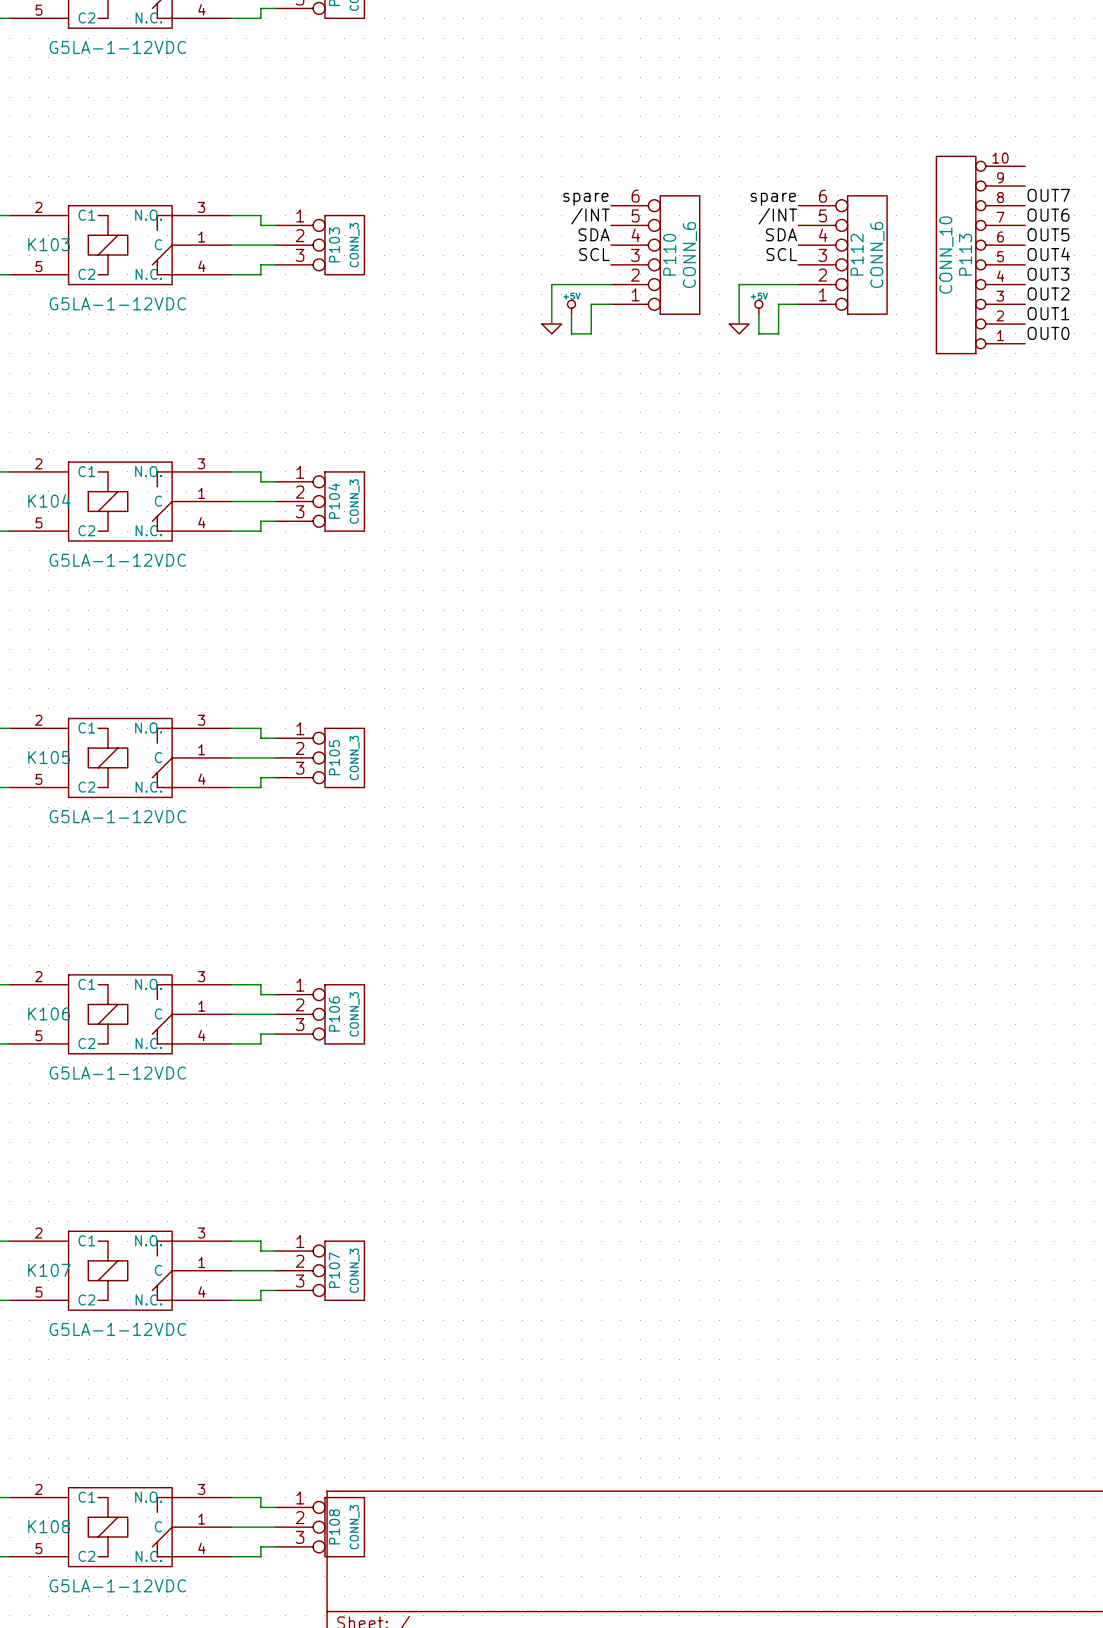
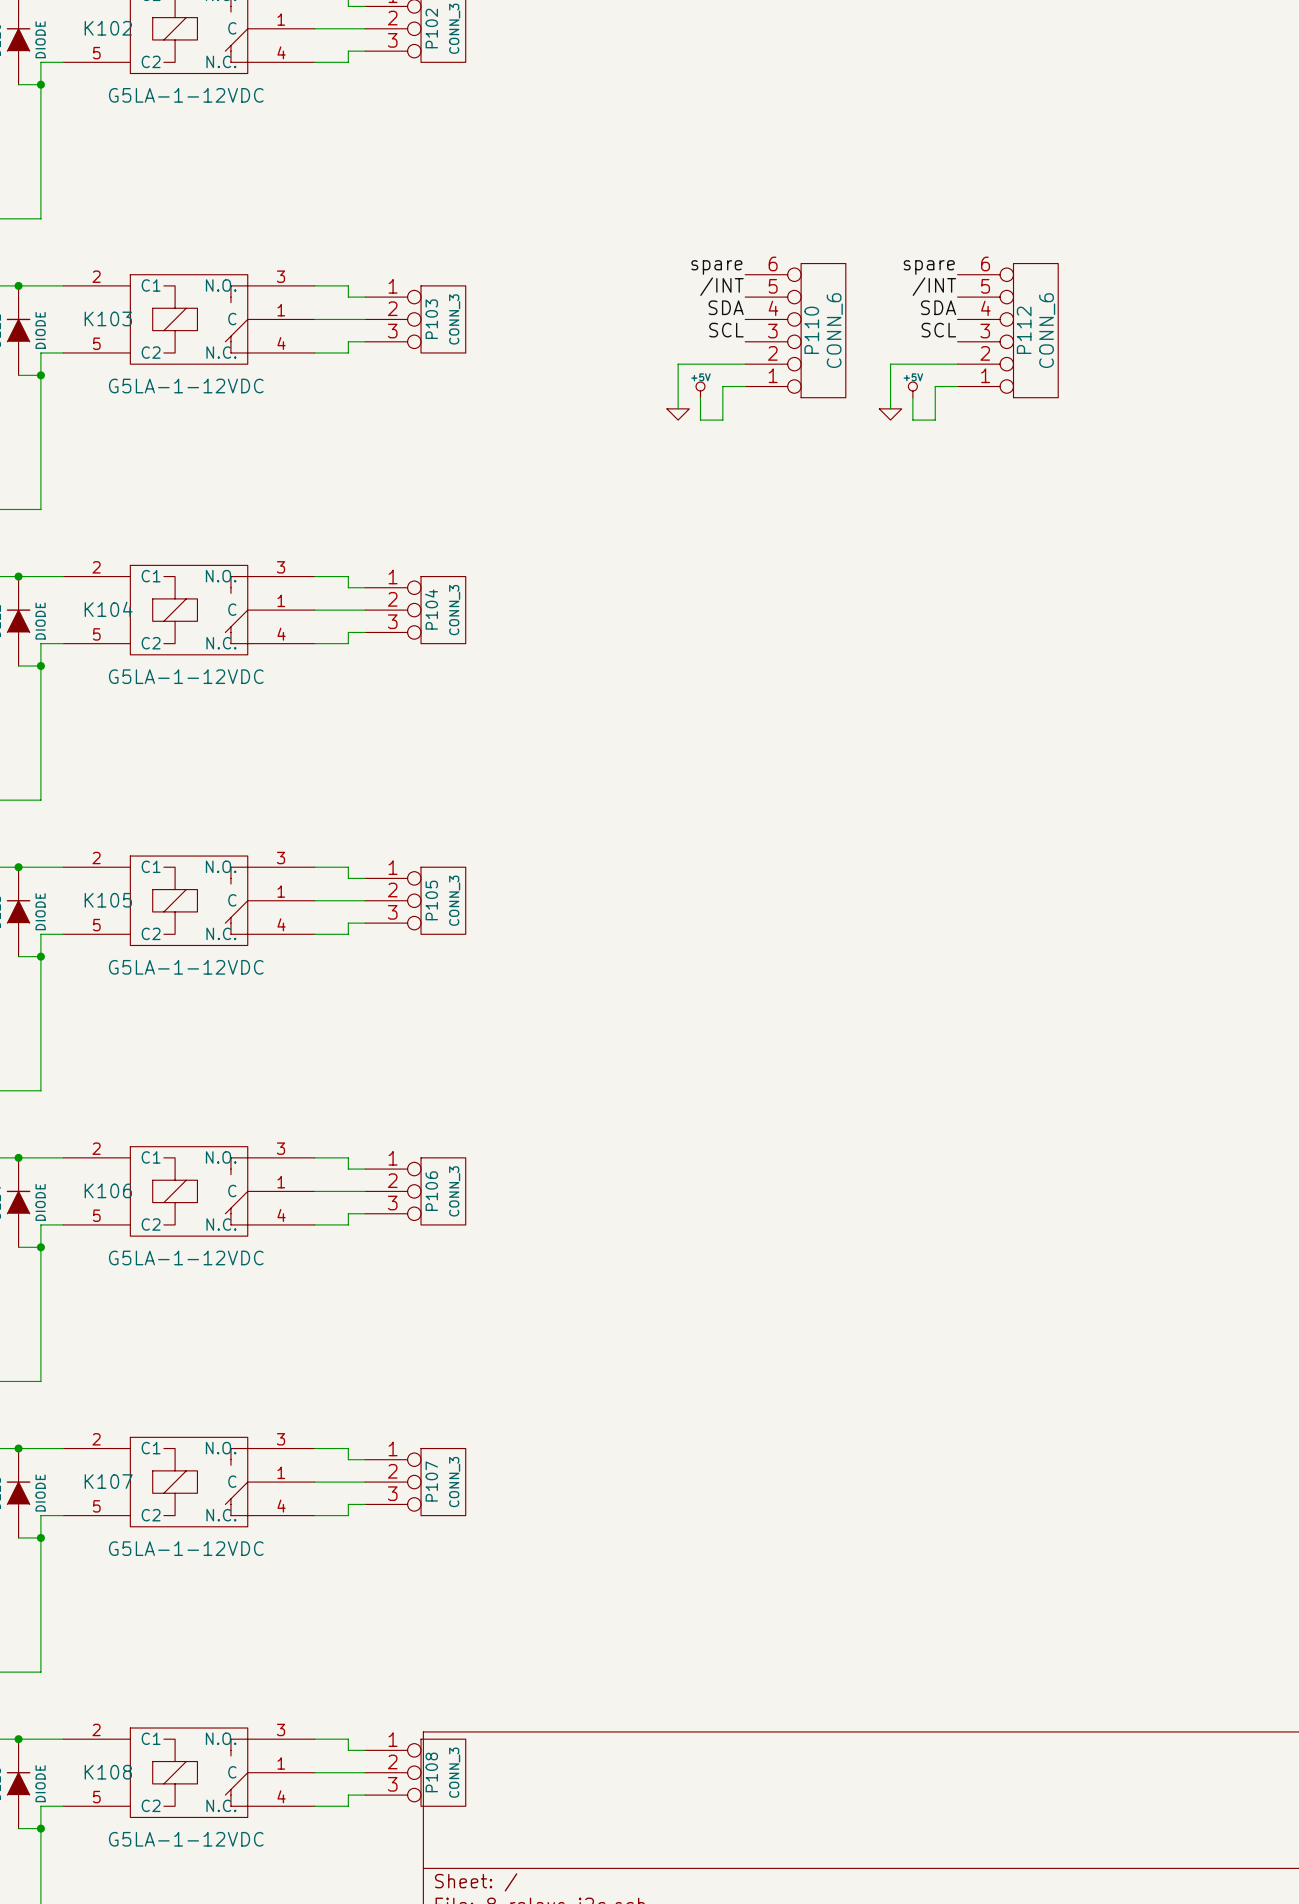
label: OUT7 (1048, 195) -> none
label: OUT6 (1048, 215) -> none
label: OUT5 (1048, 234) -> none
label: OUT4 (1048, 254) -> none
P113: CONN_10 (980, 255) -> none
label: OUT3 (1048, 274) -> none
label: OUT2 (1048, 293) -> none
label: OUT1 (1048, 313) -> none
label: OUT0 (1048, 333) -> none

